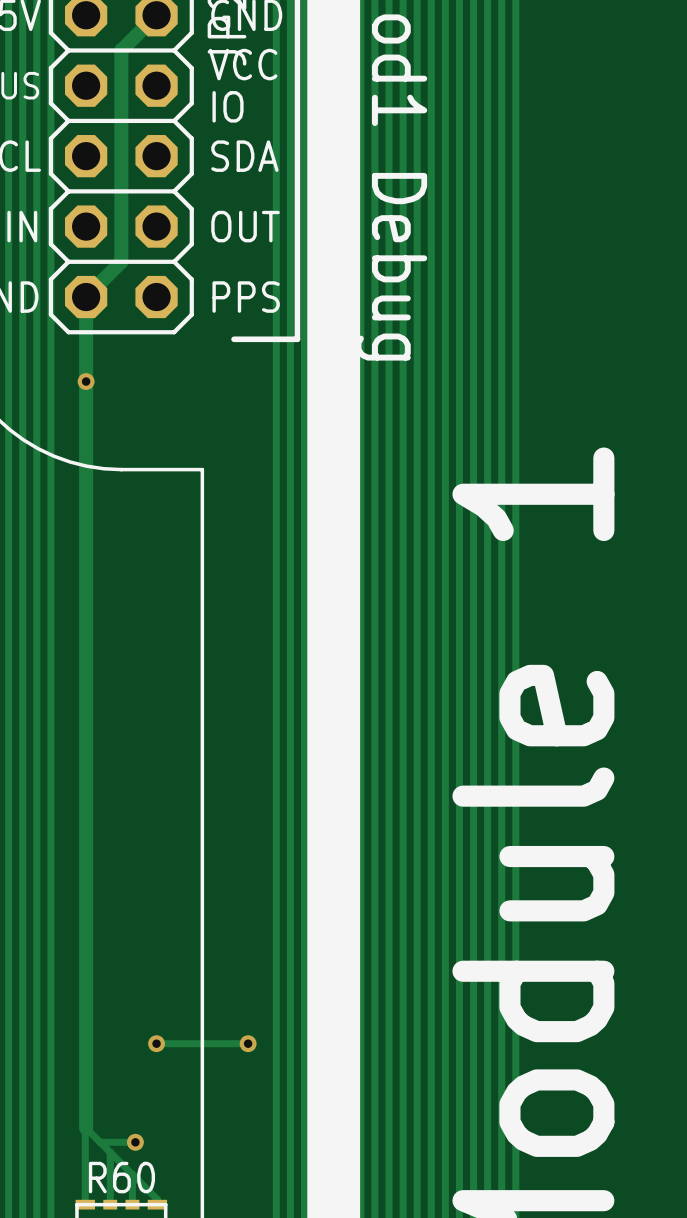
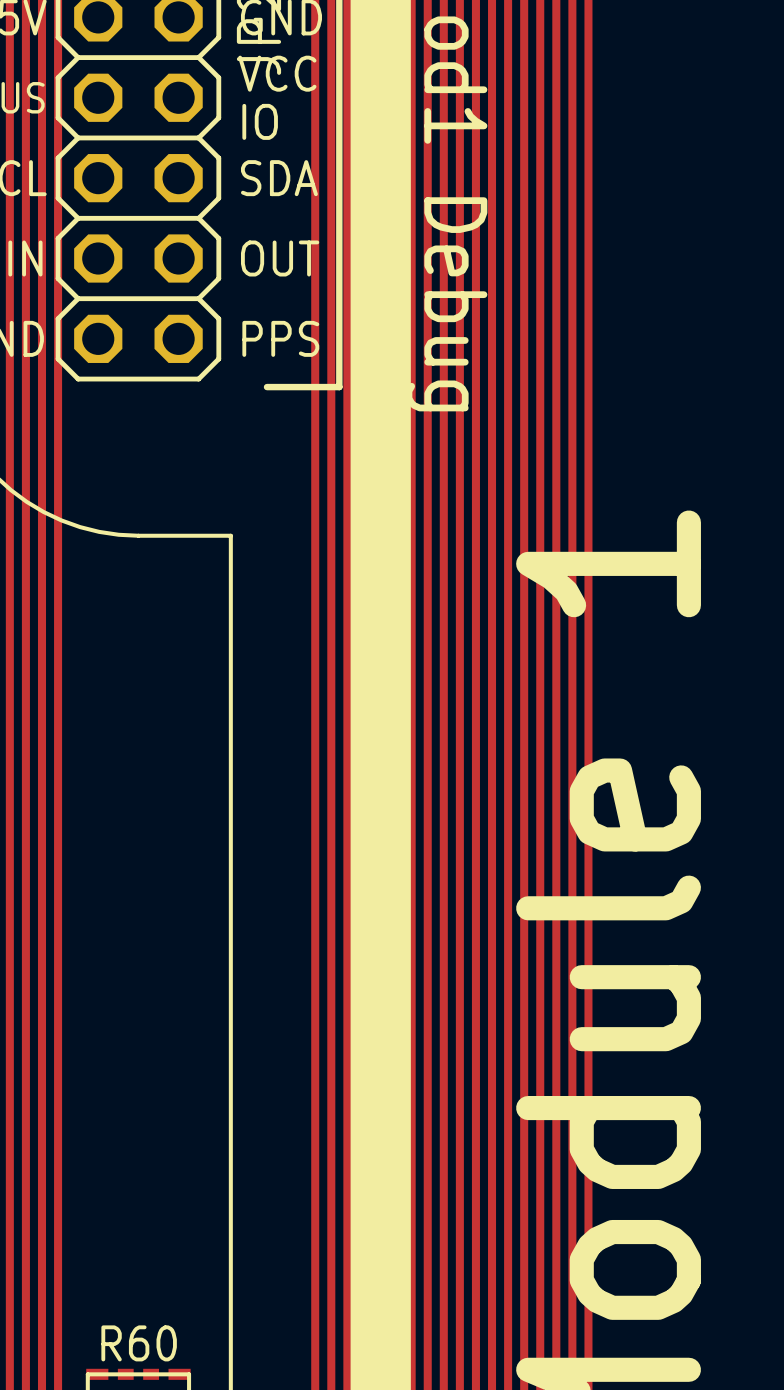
track: (156, 15) (121, 50) (121, 261) (86, 297) (86, 1128) -> none
via: (86, 381) -> none
track: (156, 1043) (248, 1043) -> none
via: (156, 1043) -> none
via: (248, 1043) -> none
track: (86, 1128) (85, 1204) -> none
track: (86, 1128) (157, 1199) (157, 1204) -> none
track: (100, 1142) (135, 1142) -> none
via: (135, 1142) -> none
track: (110, 1152) (110, 1204) -> none
track: (132, 1174) (132, 1204) -> none

